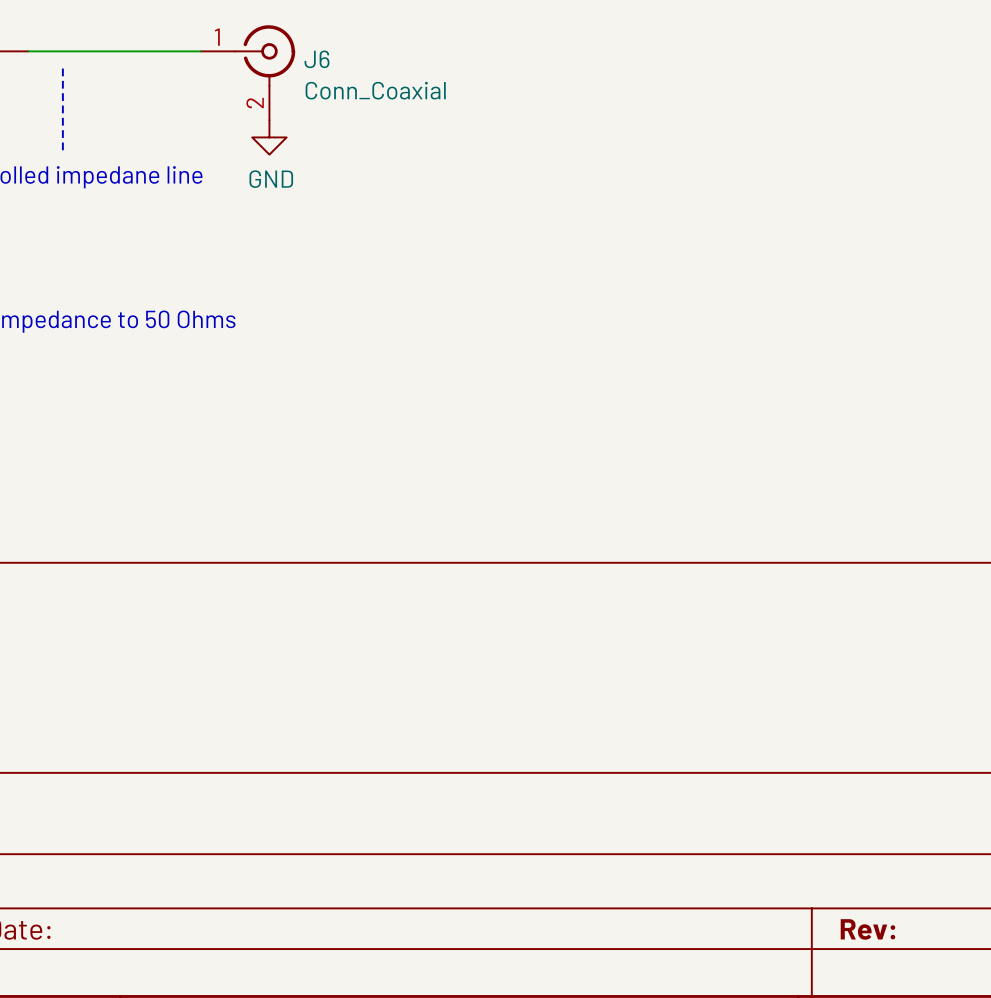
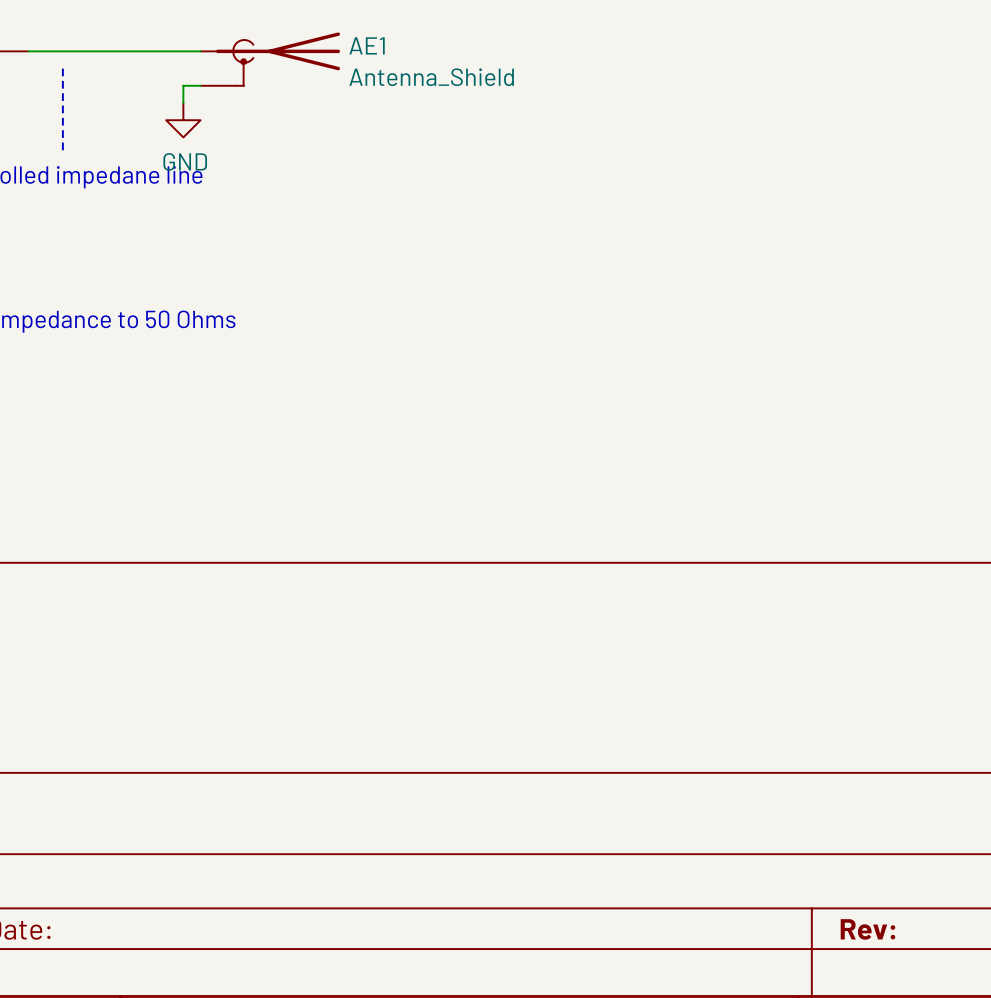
AE1: none -> Antenna_Shield (270, 59)
J6: Conn_Coaxial (247, 72) -> none
wire: none -> (200, 85) (183, 85) (183, 103)
power symbol position: GND (269, 137) -> GND (183, 120)

